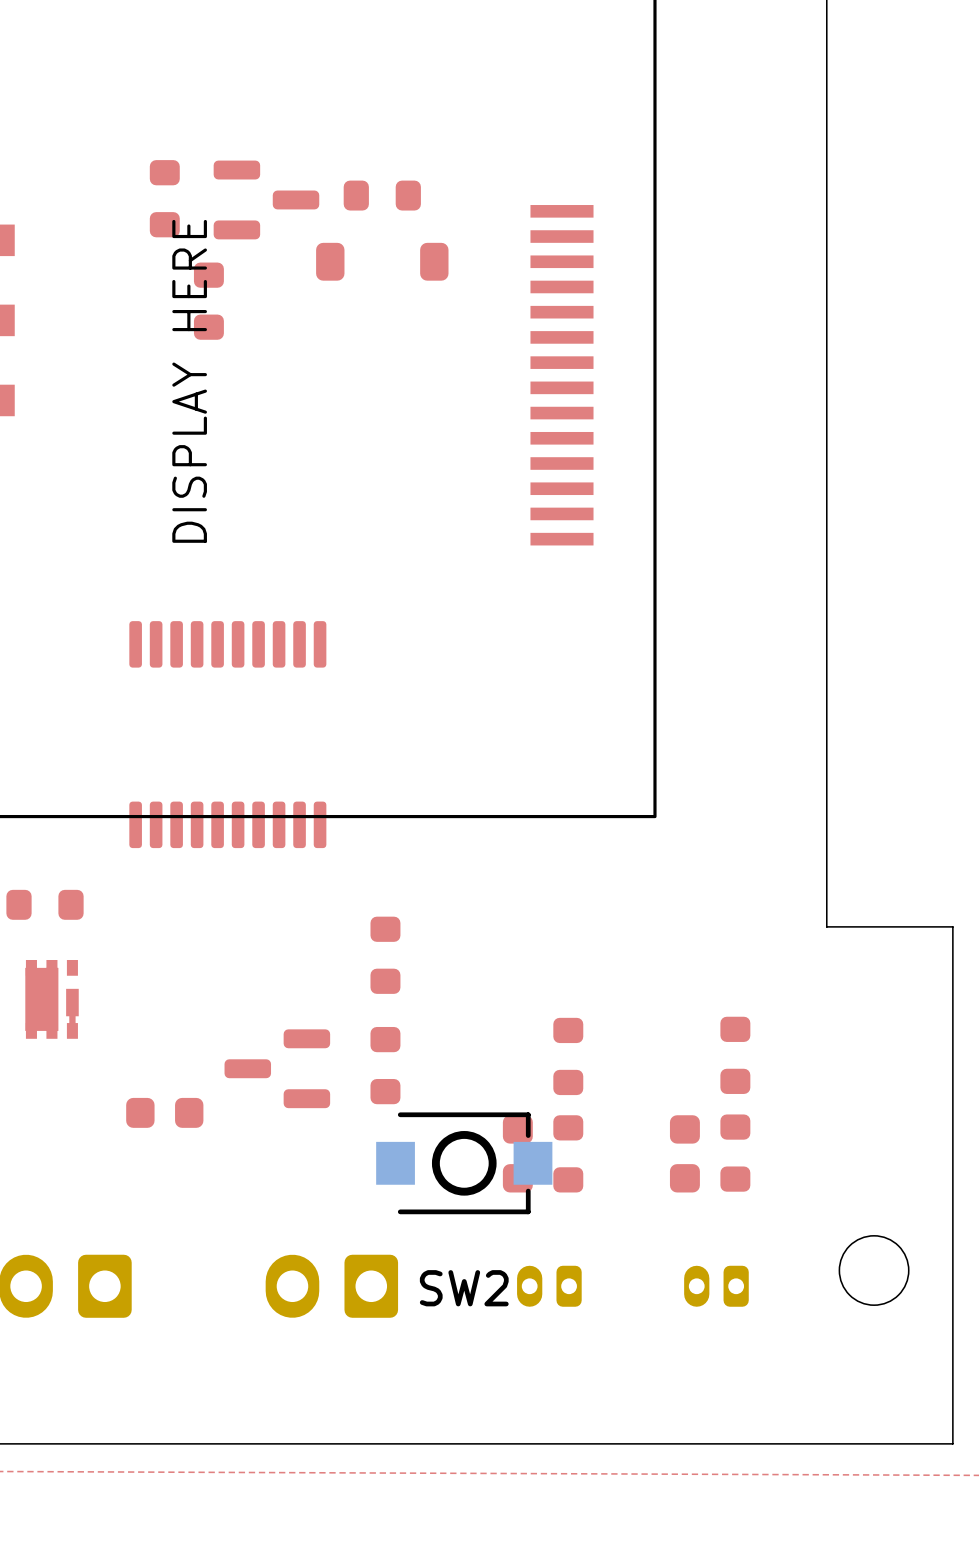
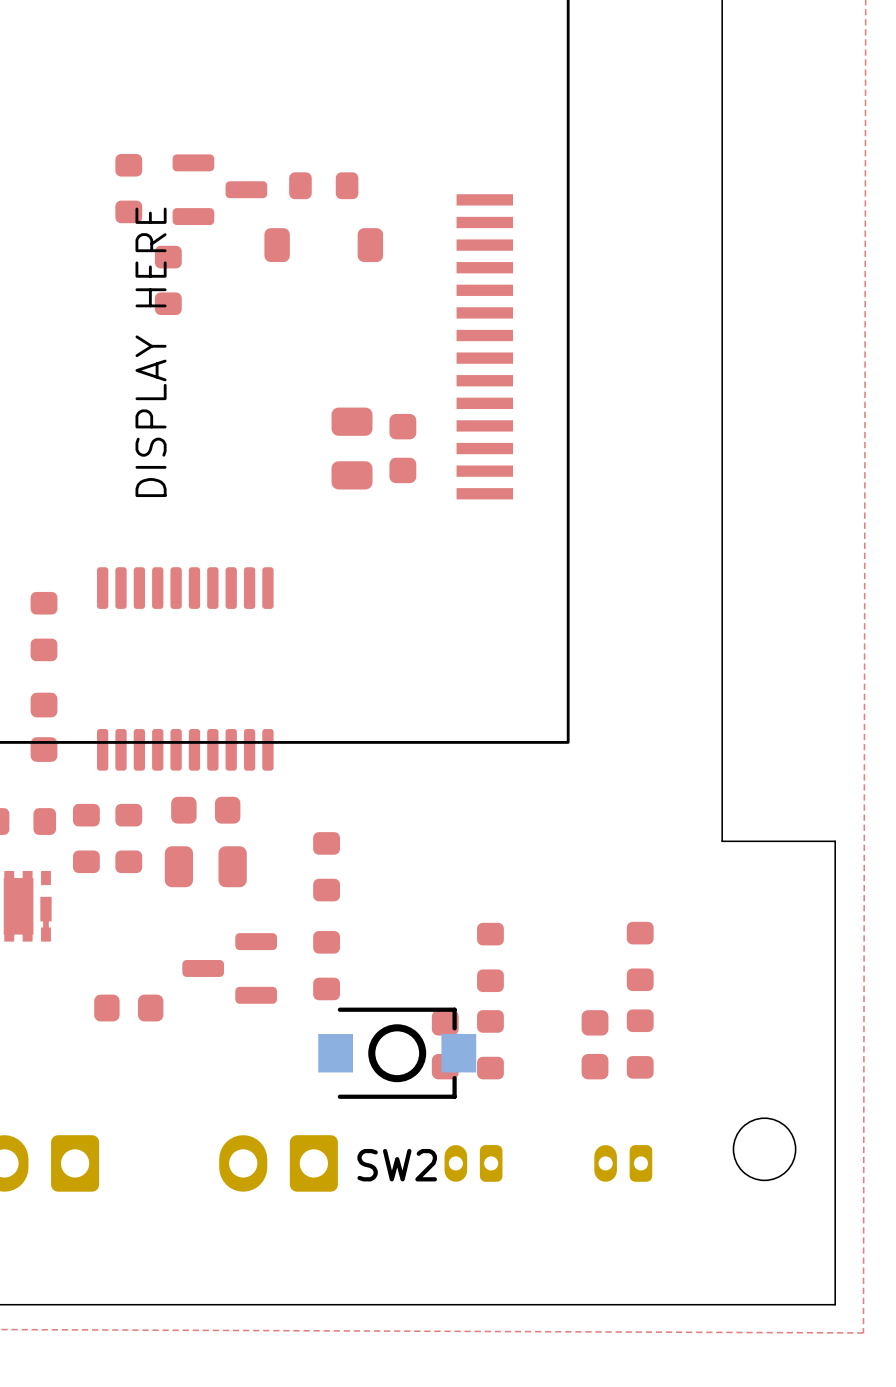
part: none -> (352, 448)
part: none -> (402, 448)
part: none -> (44, 626)
part: none -> (44, 727)
part: none -> (205, 810)
part: none -> (86, 838)
part: none -> (128, 838)
part: none -> (205, 866)

